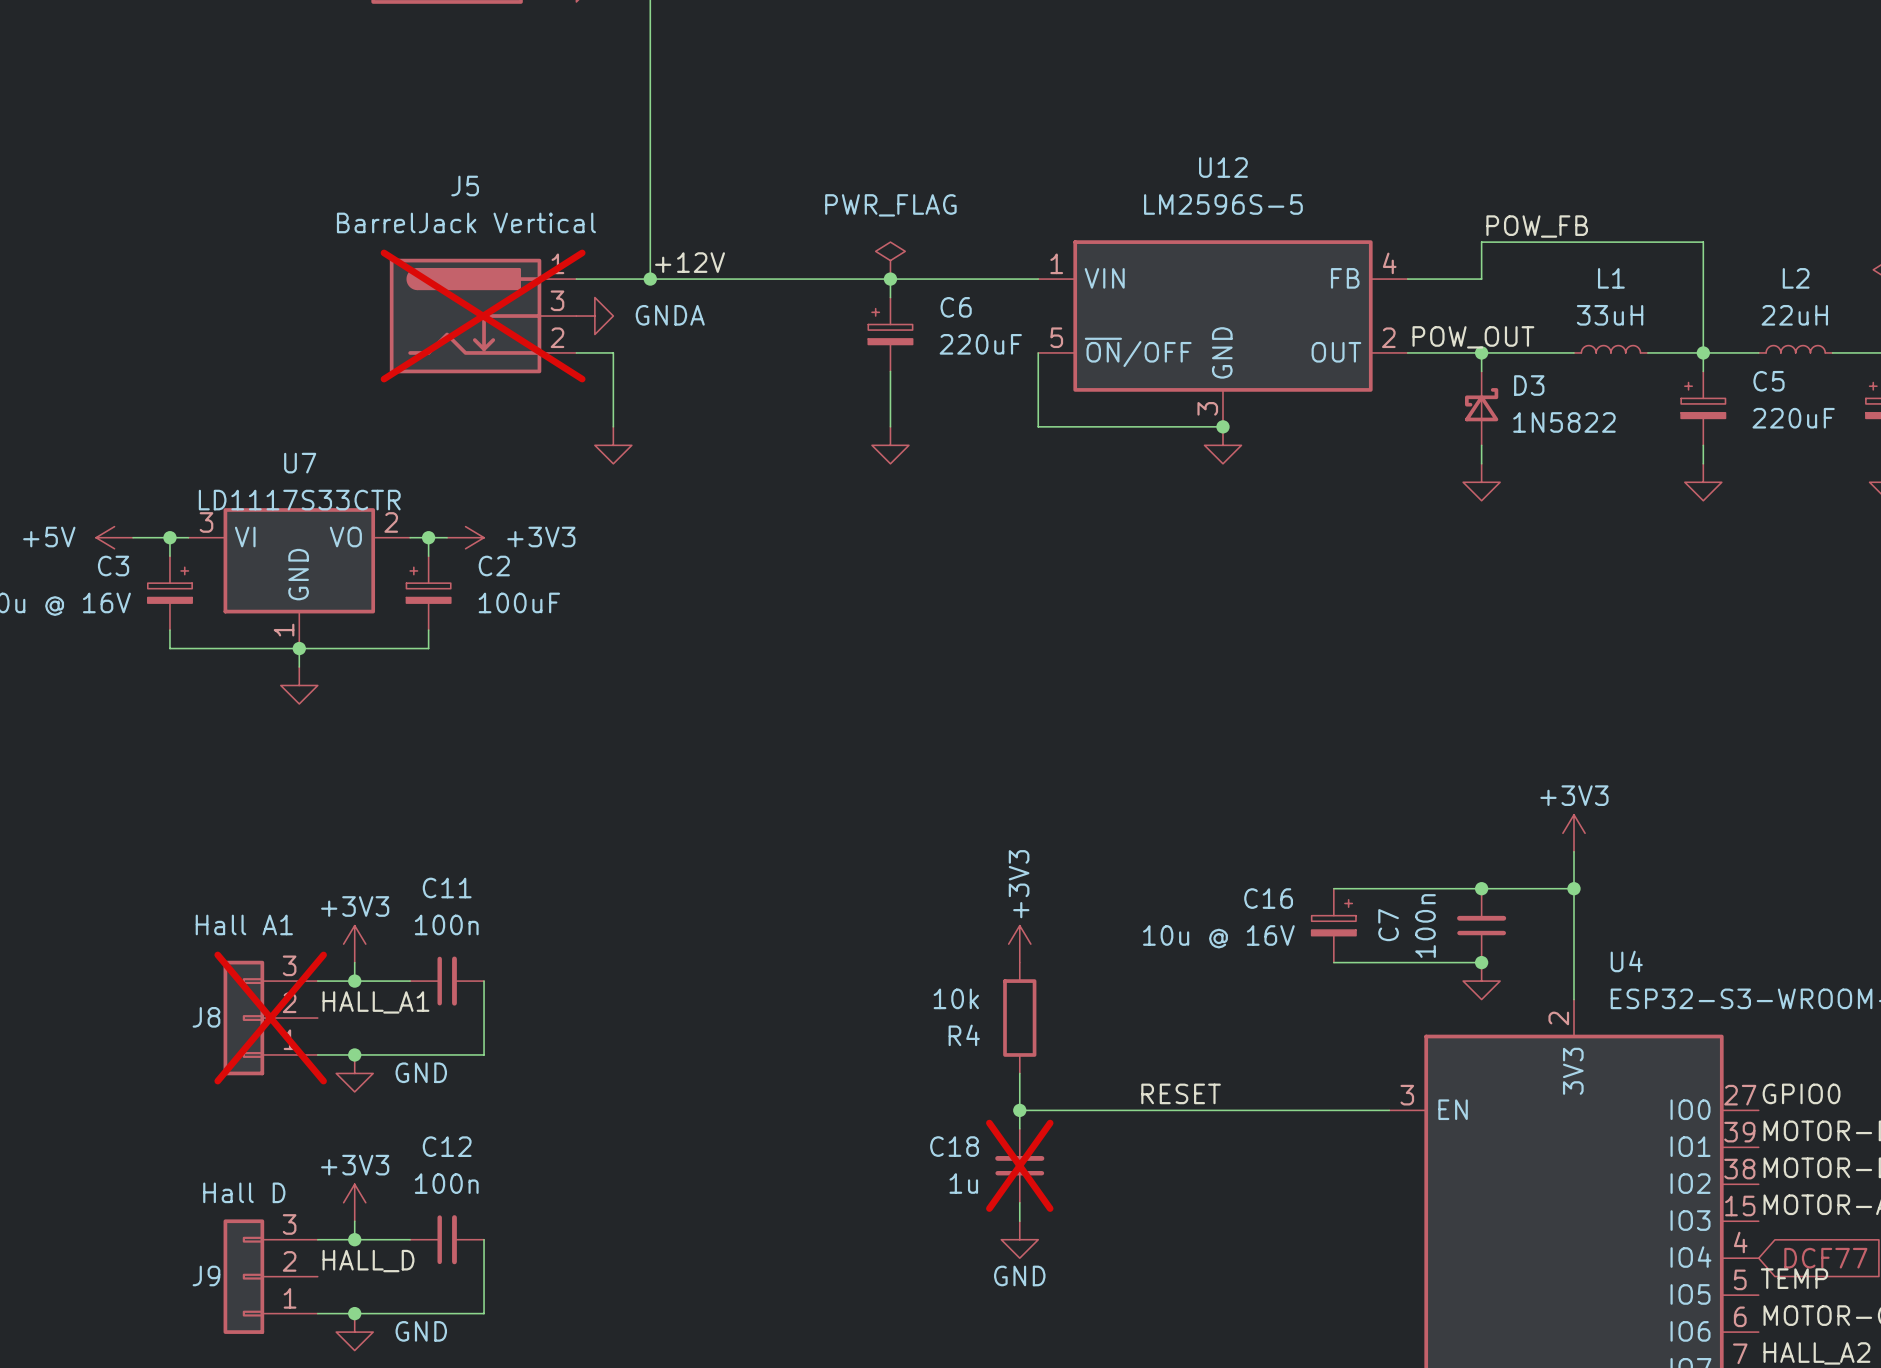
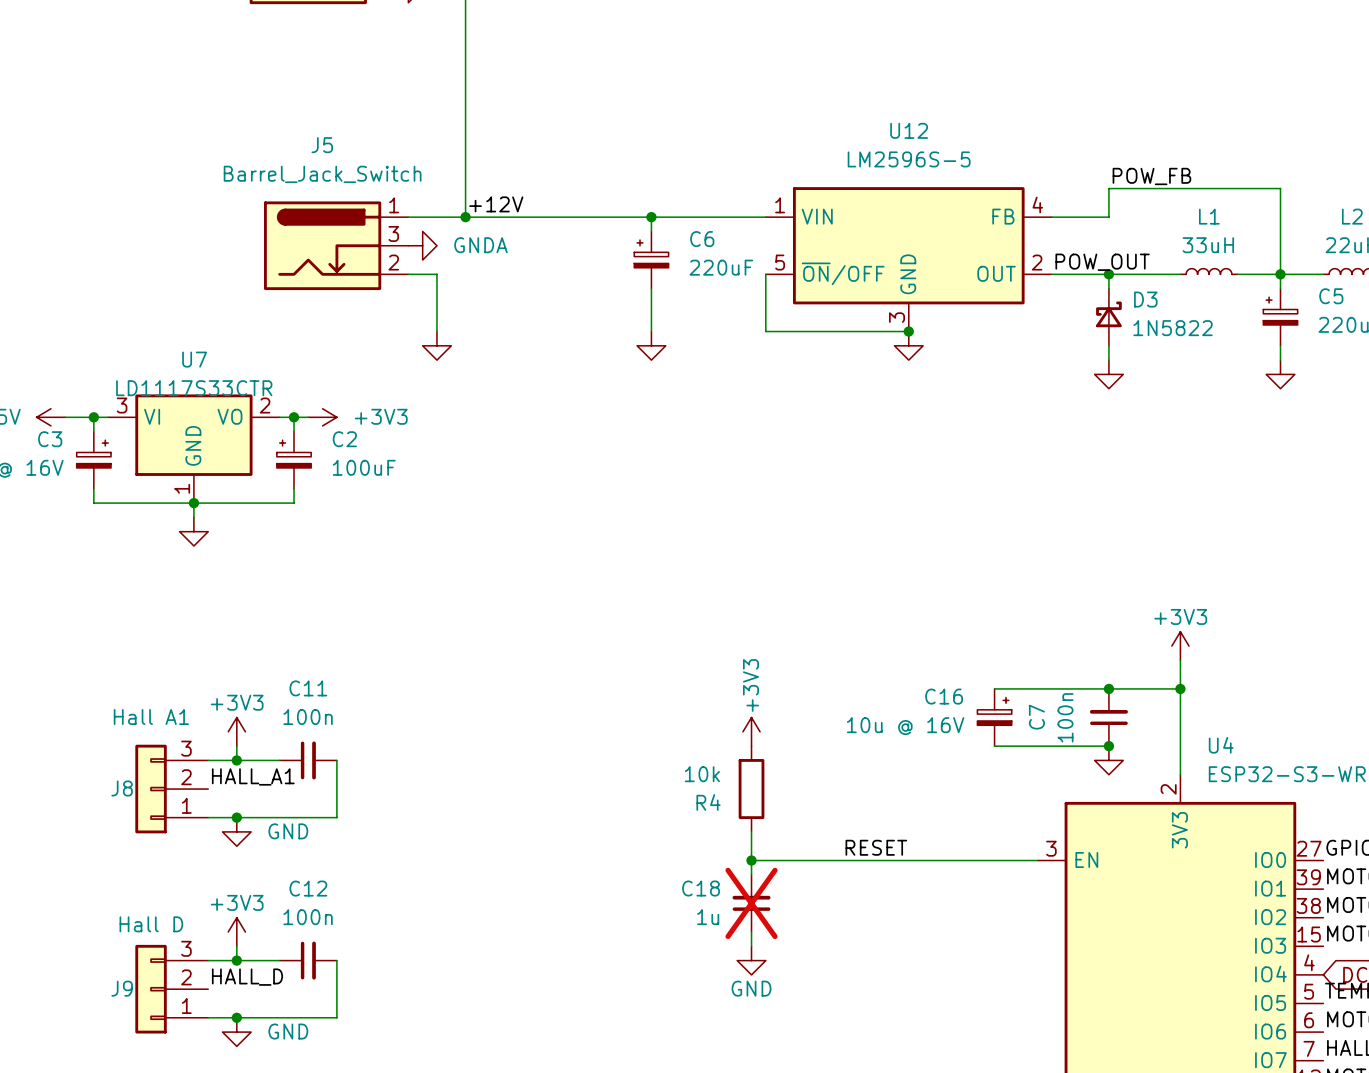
J5 value: BarrelJack Vertical (466, 222) -> Barrel_Jack_Switch (322, 174)
power symbol: PWR_FLAG (890, 260) -> none
J5 do-not-place cross: (483, 316) -> none
J8 do-not-place cross: (270, 1018) -> none

